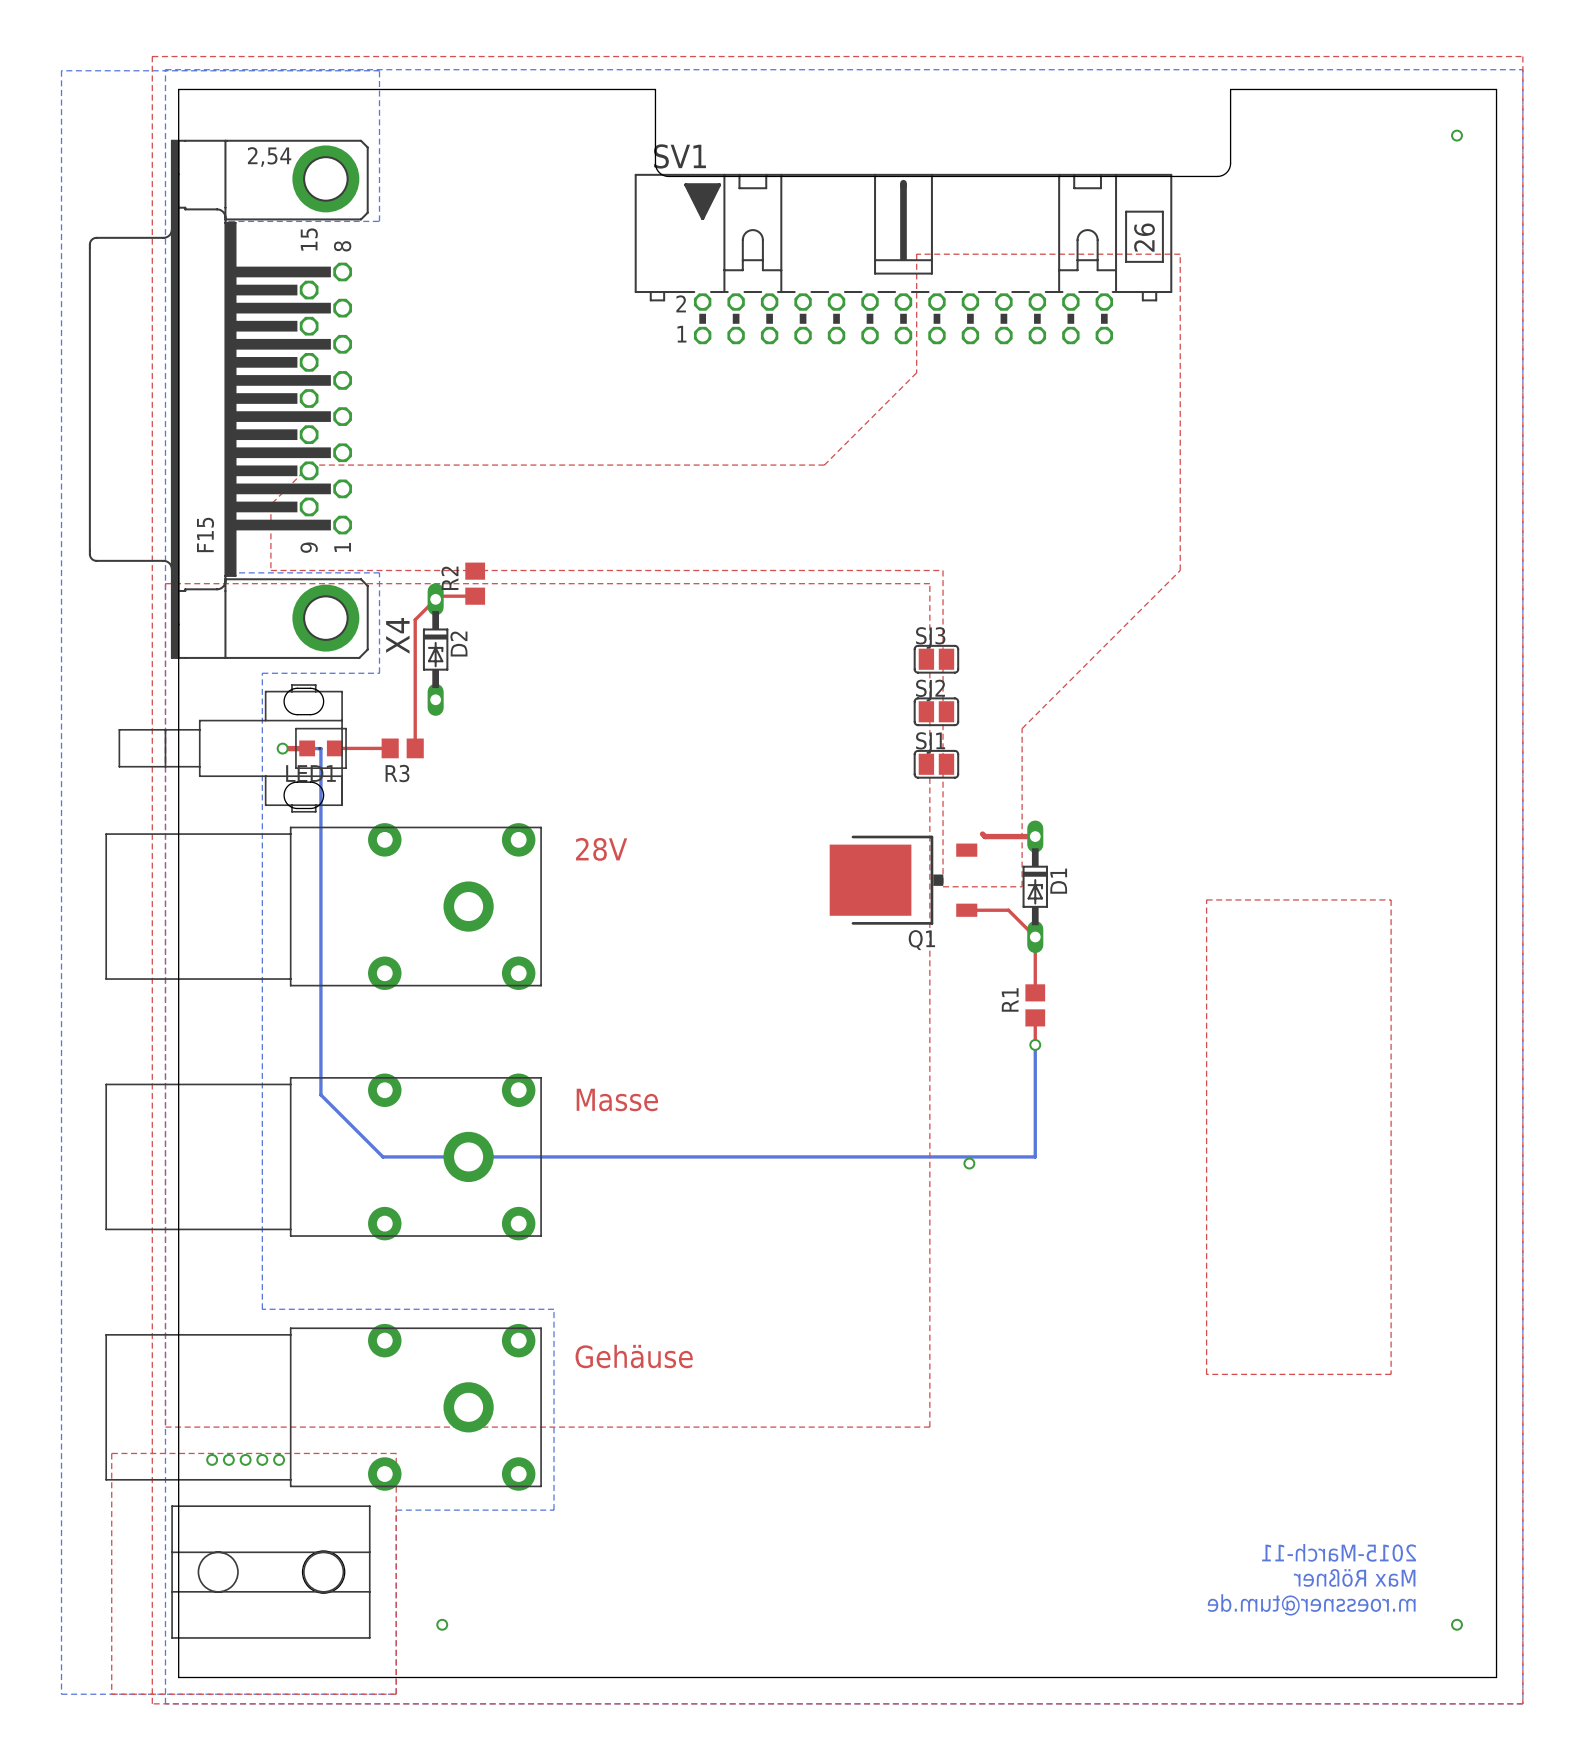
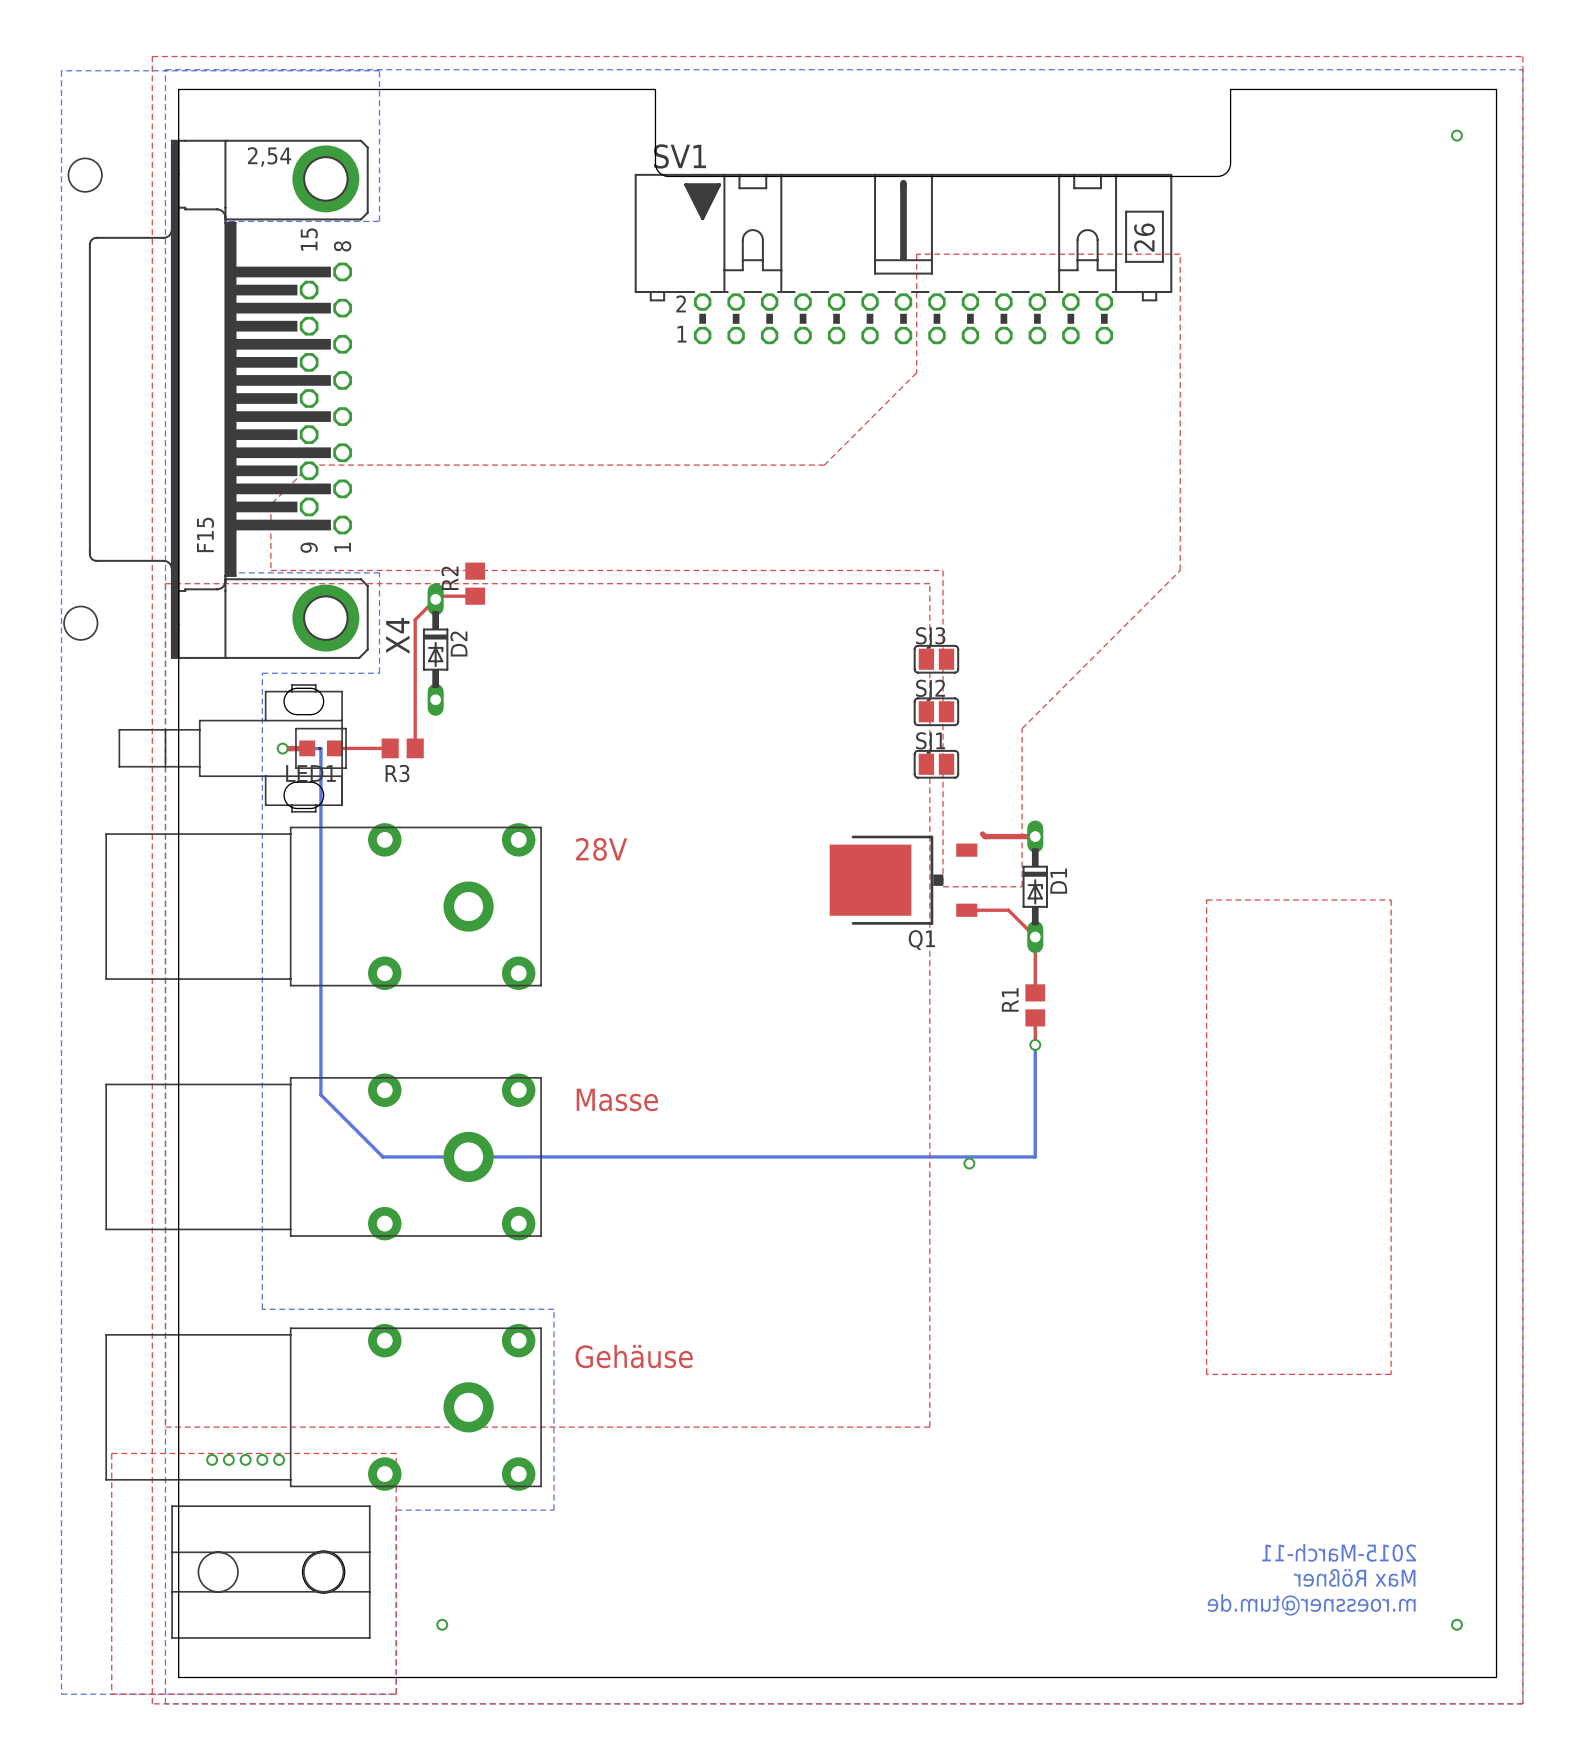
drawing: none -> [67, 157, 103, 193]
drawing: none -> [63, 605, 99, 641]

